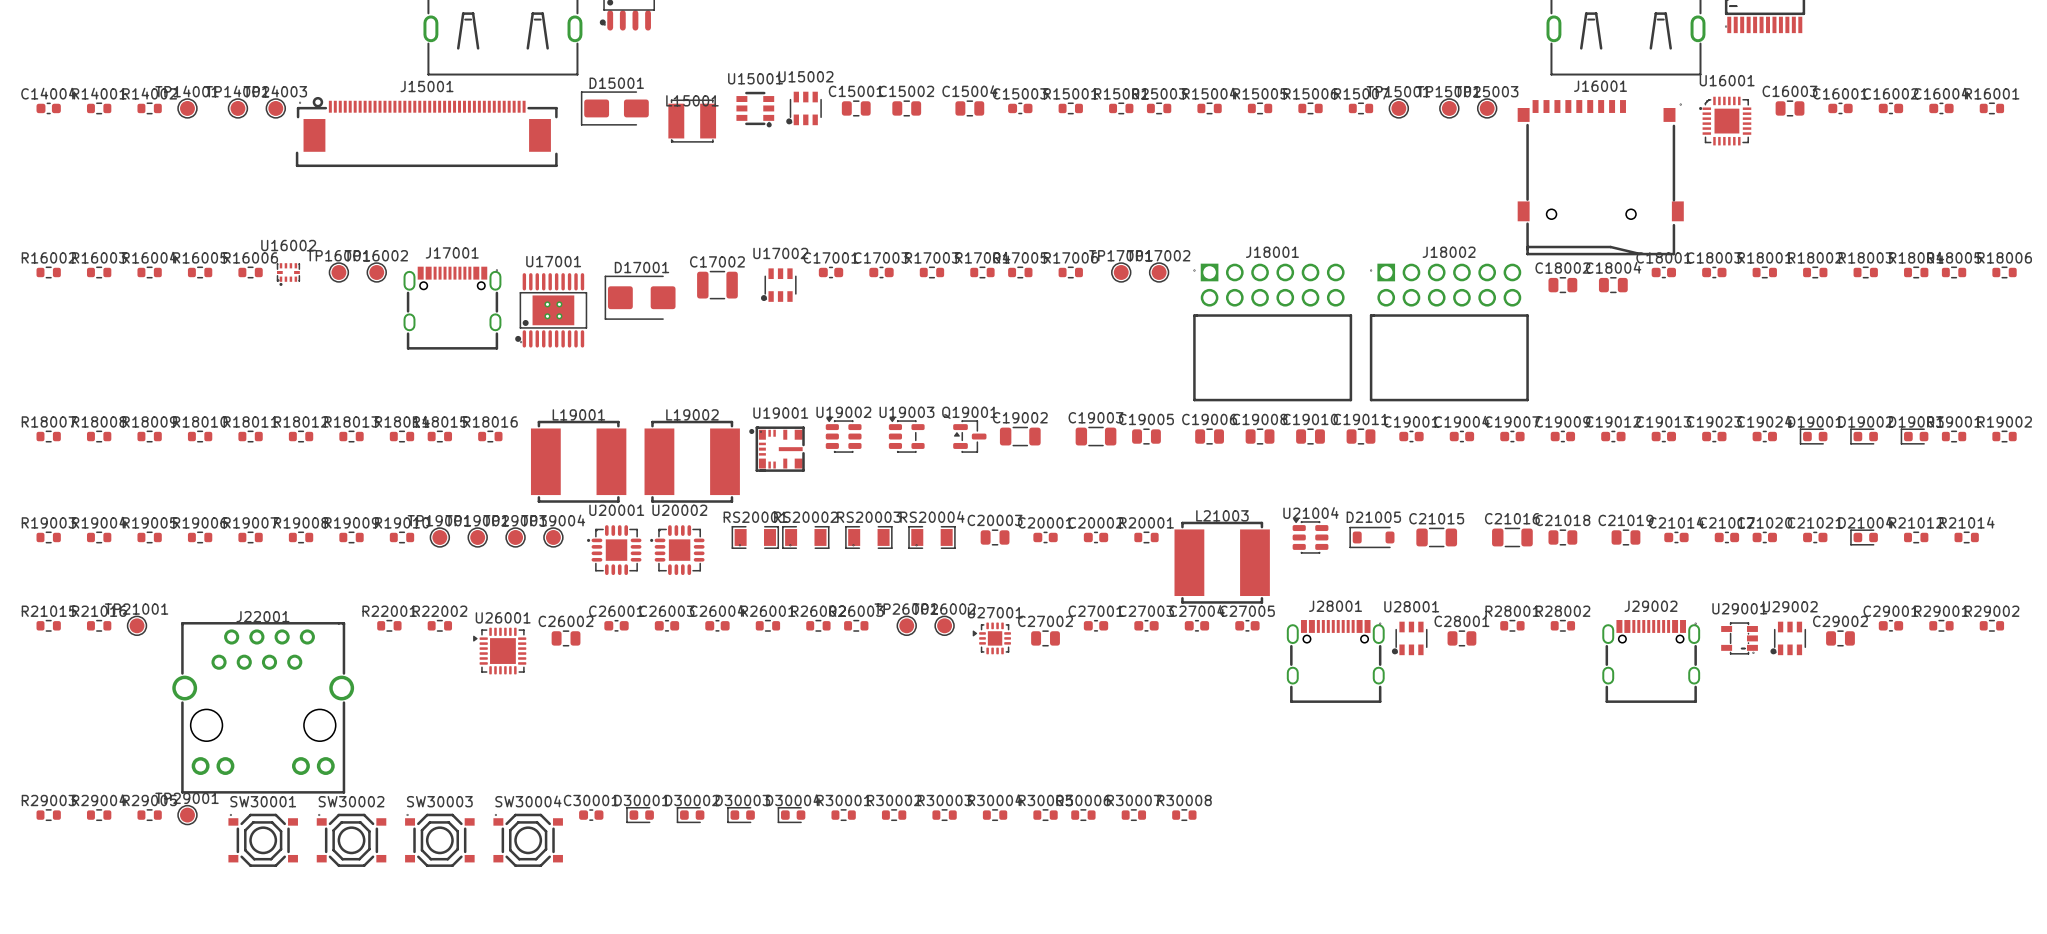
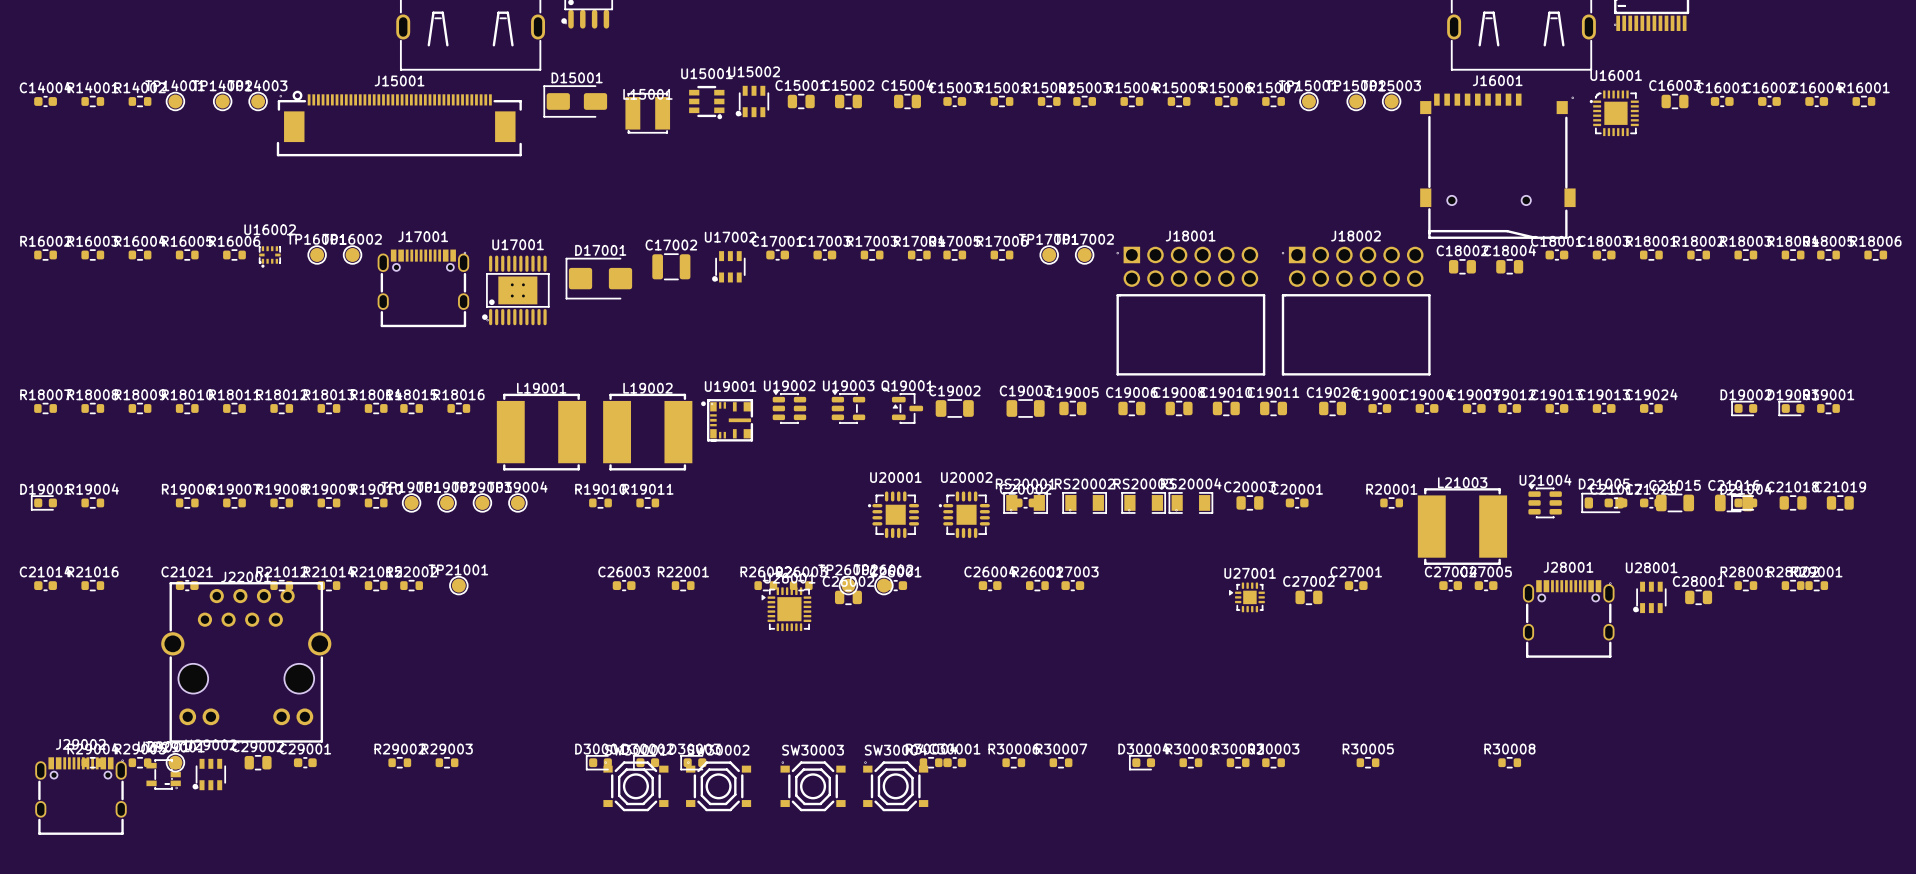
C19023 name: C19023 (1714, 421) -> C19013 (1604, 394)
C19001 position: (1411, 436) -> (1379, 408)
C19026: none -> (1332, 408)
C19004 position: (1461, 436) -> (1427, 408)
C19007 position: (1512, 436) -> (1474, 408)
C19009: (1562, 436) -> none
D19001 position: (1813, 436) -> (44, 502)
R19002: (2004, 436) -> none
U21004 position: (1310, 536) -> (1545, 501)
R19003: (48, 537) -> none
R19005: (149, 537) -> none
R19010: none -> (600, 502)
R19011: none -> (647, 502)
RS20001 position: (755, 537) -> (1025, 502)
RS20002 position: (805, 537) -> (1084, 502)
RS20003 position: (868, 537) -> (1143, 502)
RS20004 position: (931, 537) -> (1190, 502)
C20003 position: (995, 537) -> (1249, 502)
C20001 position: (1045, 537) -> (1297, 502)
R20001 position: (1146, 537) -> (1391, 502)
D21005 position: (1372, 537) -> (1602, 502)
C21015 position: (1436, 537) -> (1675, 502)
C21016 position: (1512, 537) -> (1734, 502)
C21018 position: (1562, 537) -> (1793, 502)
C21019 position: (1625, 537) -> (1840, 502)
C21014 position: (1676, 537) -> (45, 585)
C21021 position: (1815, 537) -> (187, 585)
R21012 position: (1916, 537) -> (281, 585)
R21014 position: (1966, 537) -> (328, 585)
U20001 position: (614, 550) -> (893, 514)
U20002 position: (677, 550) -> (964, 514)
L21003 position: (1222, 562) -> (1462, 526)
R21015 position: (48, 625) -> (376, 585)
TP21001 position: (137, 625) -> (458, 585)
R22001 position: (389, 625) -> (683, 585)
C26001 position: (616, 625) -> (895, 585)
C26004 position: (717, 625) -> (990, 585)
R26001 position: (767, 625) -> (1037, 585)
C27001 position: (1096, 625) -> (1356, 585)
C27004 position: (1196, 625) -> (1450, 585)
C27005 position: (1247, 625) -> (1486, 585)
R28001 position: (1512, 625) -> (1745, 585)
R28002 position: (1562, 625) -> (1793, 585)
C29001 position: (1890, 625) -> (305, 762)
R29002 position: (1991, 625) -> (399, 762)
C26002 position: (566, 638) -> (848, 597)
U27001 position: (991, 638) -> (1246, 597)
C27002 position: (1045, 638) -> (1308, 597)
U28001 position: (1409, 638) -> (1649, 597)
C28001 position: (1461, 638) -> (1698, 597)
U29001 position: (1739, 638) -> (163, 774)
U29002 position: (1788, 638) -> (209, 774)
C29002 position: (1840, 638) -> (258, 762)
U26001 position: (499, 651) -> (786, 609)
J28001 position: (1335, 661) -> (1568, 618)
J29002 position: (1651, 661) -> (80, 796)
R29003 position: (48, 815) -> (447, 762)
C30001 position: (591, 815) -> (954, 762)
D30004 position: (791, 815) -> (1142, 762)
R30001 position: (843, 815) -> (1190, 762)
R30002 position: (894, 815) -> (1238, 762)
R30003 position: (944, 815) -> (1273, 762)
R30005 position: (1045, 815) -> (1368, 762)
R30008 position: (1184, 815) -> (1509, 762)
SW30001 position: (263, 840) -> (635, 786)
SW30002 position: (351, 840) -> (718, 786)
SW30003 position: (439, 840) -> (813, 786)
SW30004 position: (528, 840) -> (895, 786)

